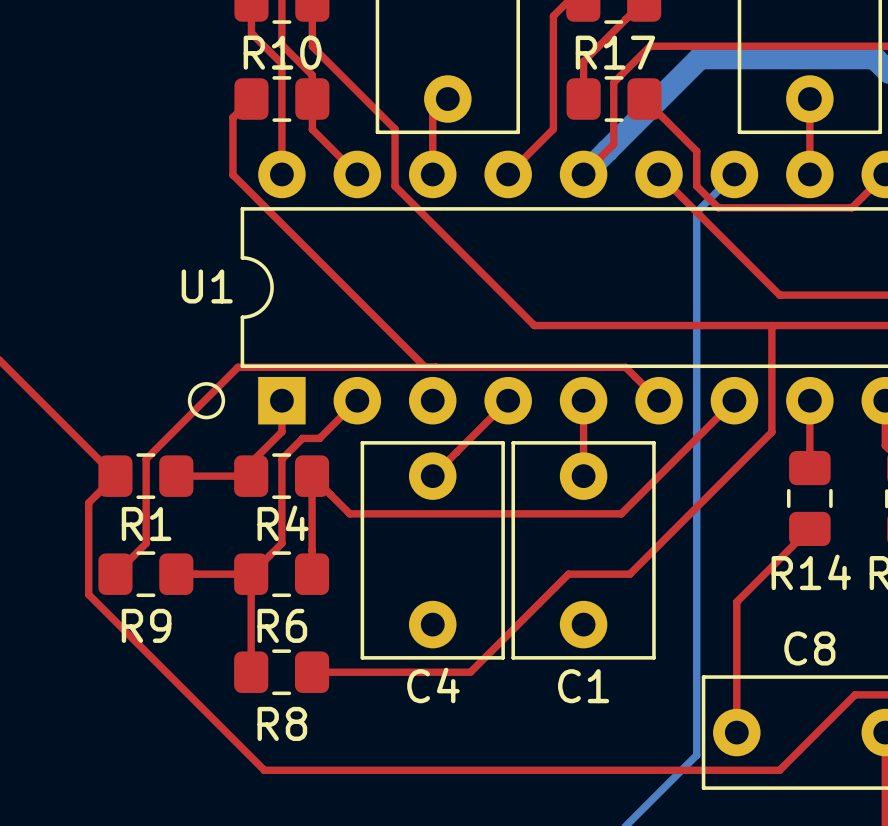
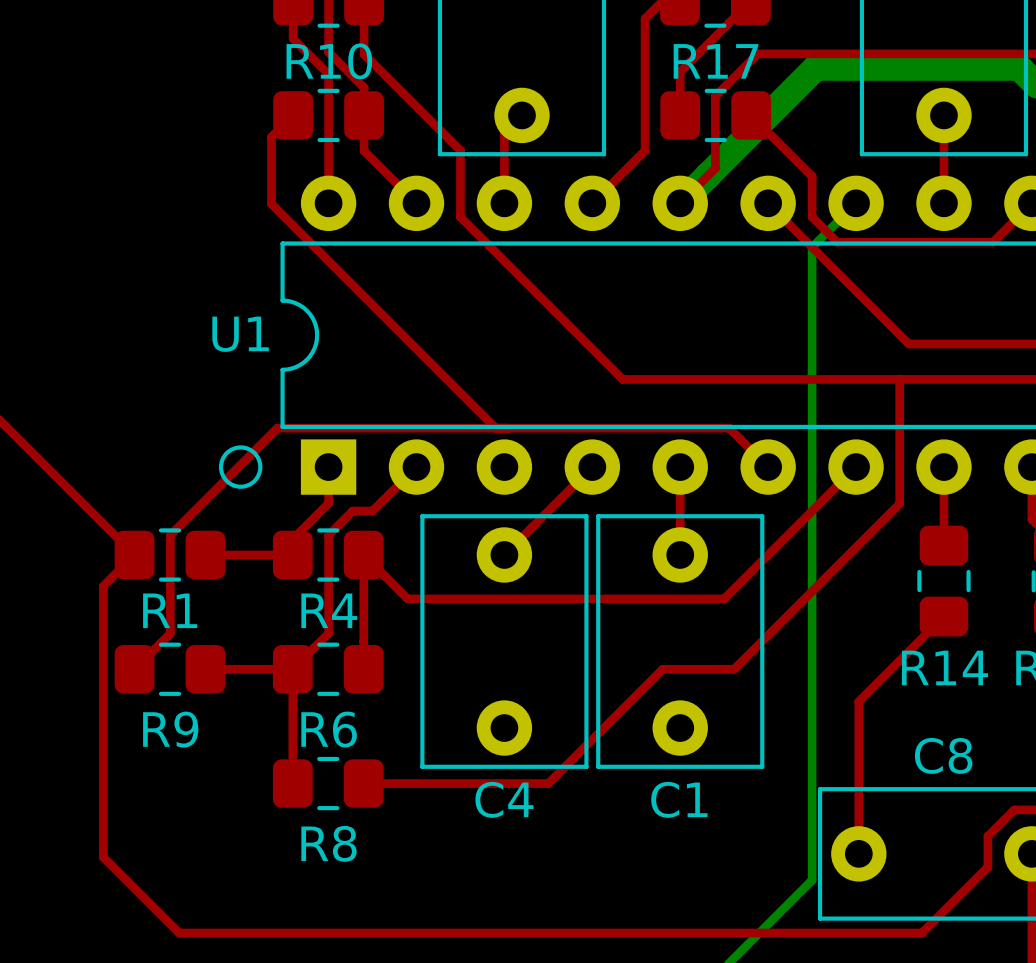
top track: (88, 594) (264, 770) (779, 770) (855, 694) (870, 694) -> (103, 693) (103, 857) (179, 933) (921, 933) (987, 867) (987, 836) (1014, 809)

